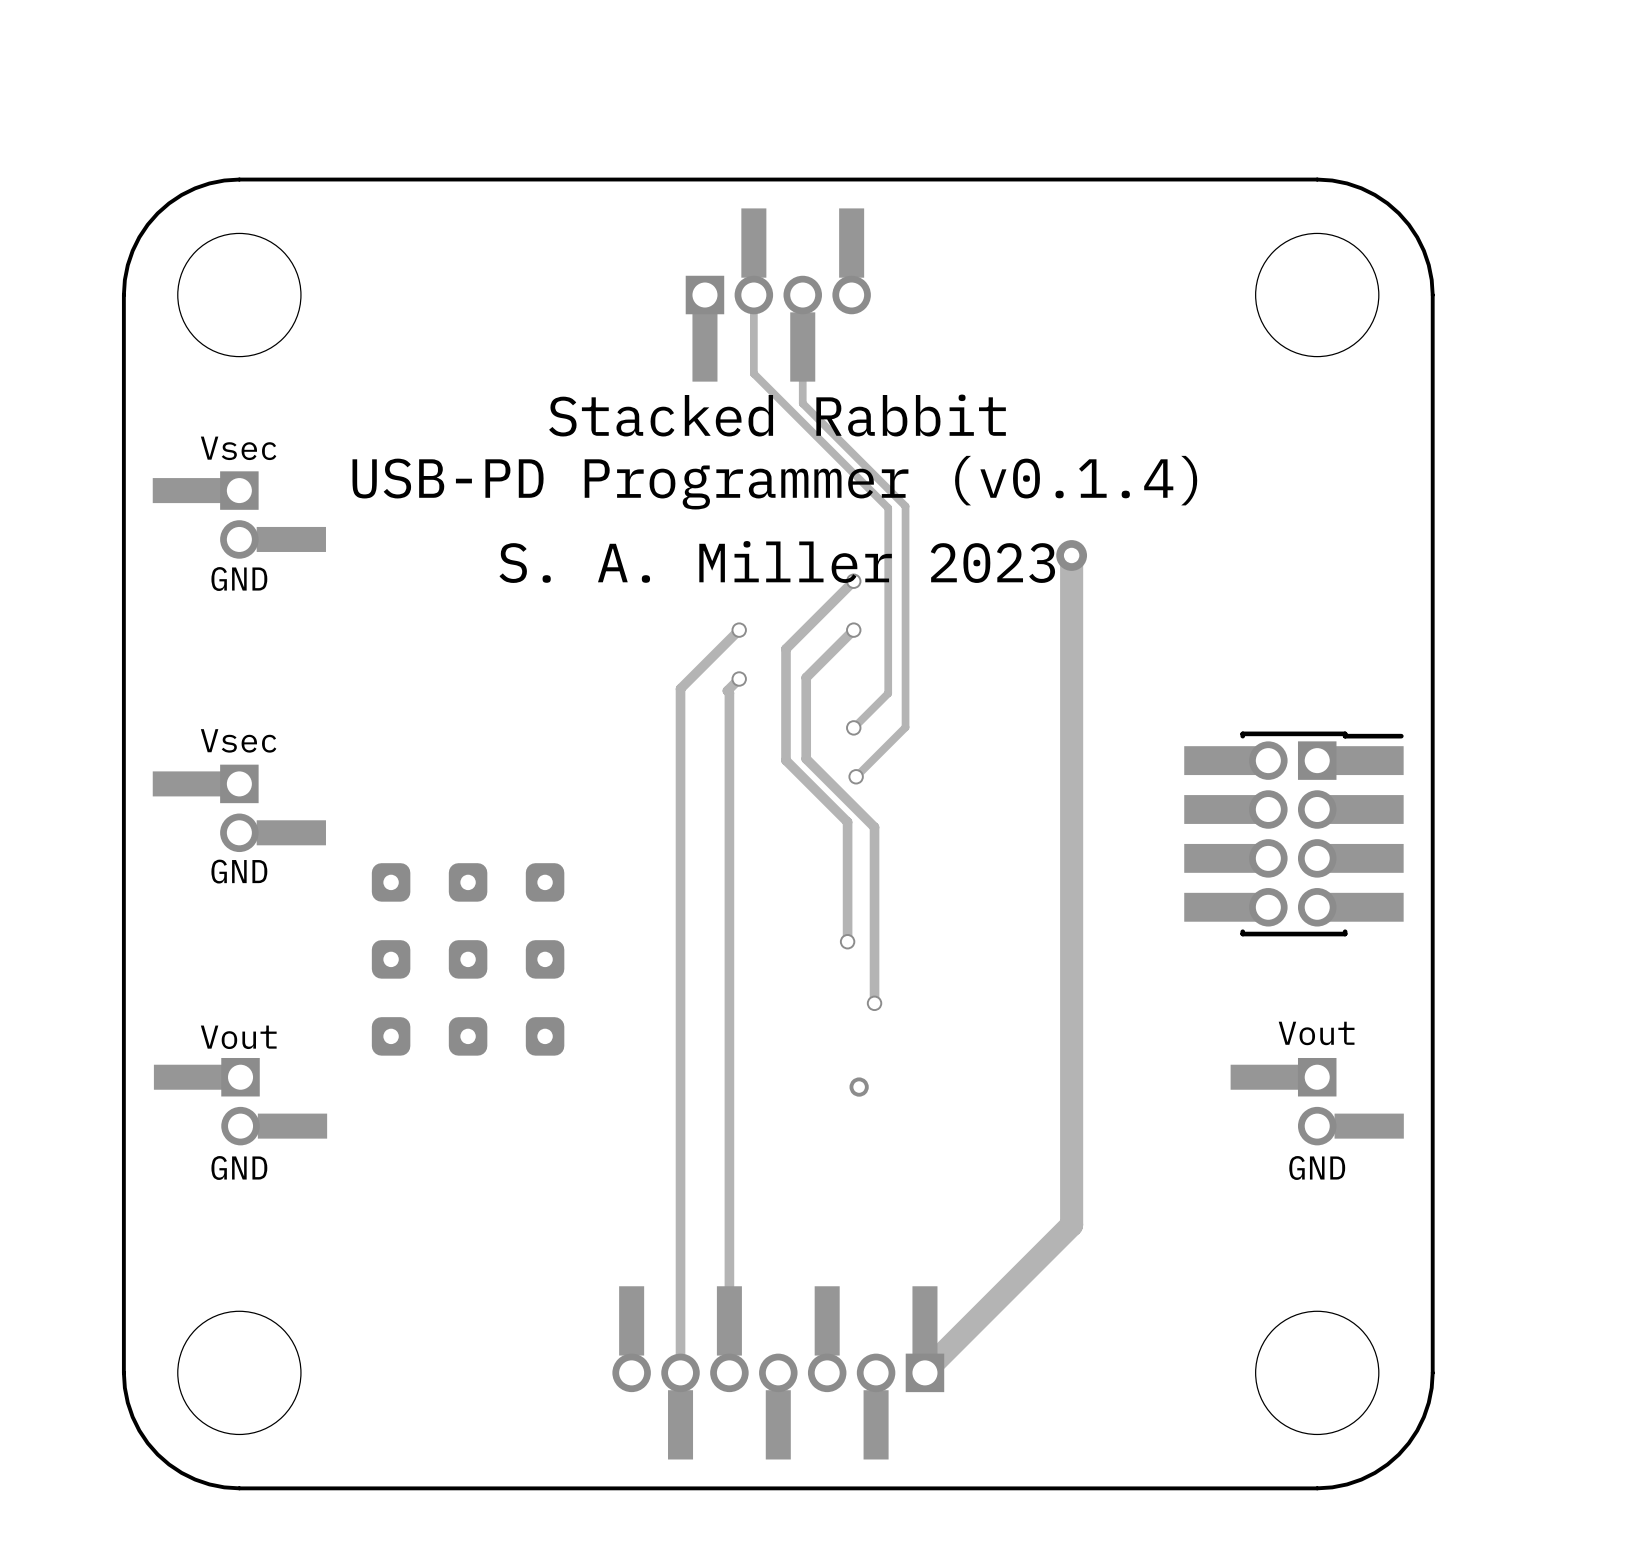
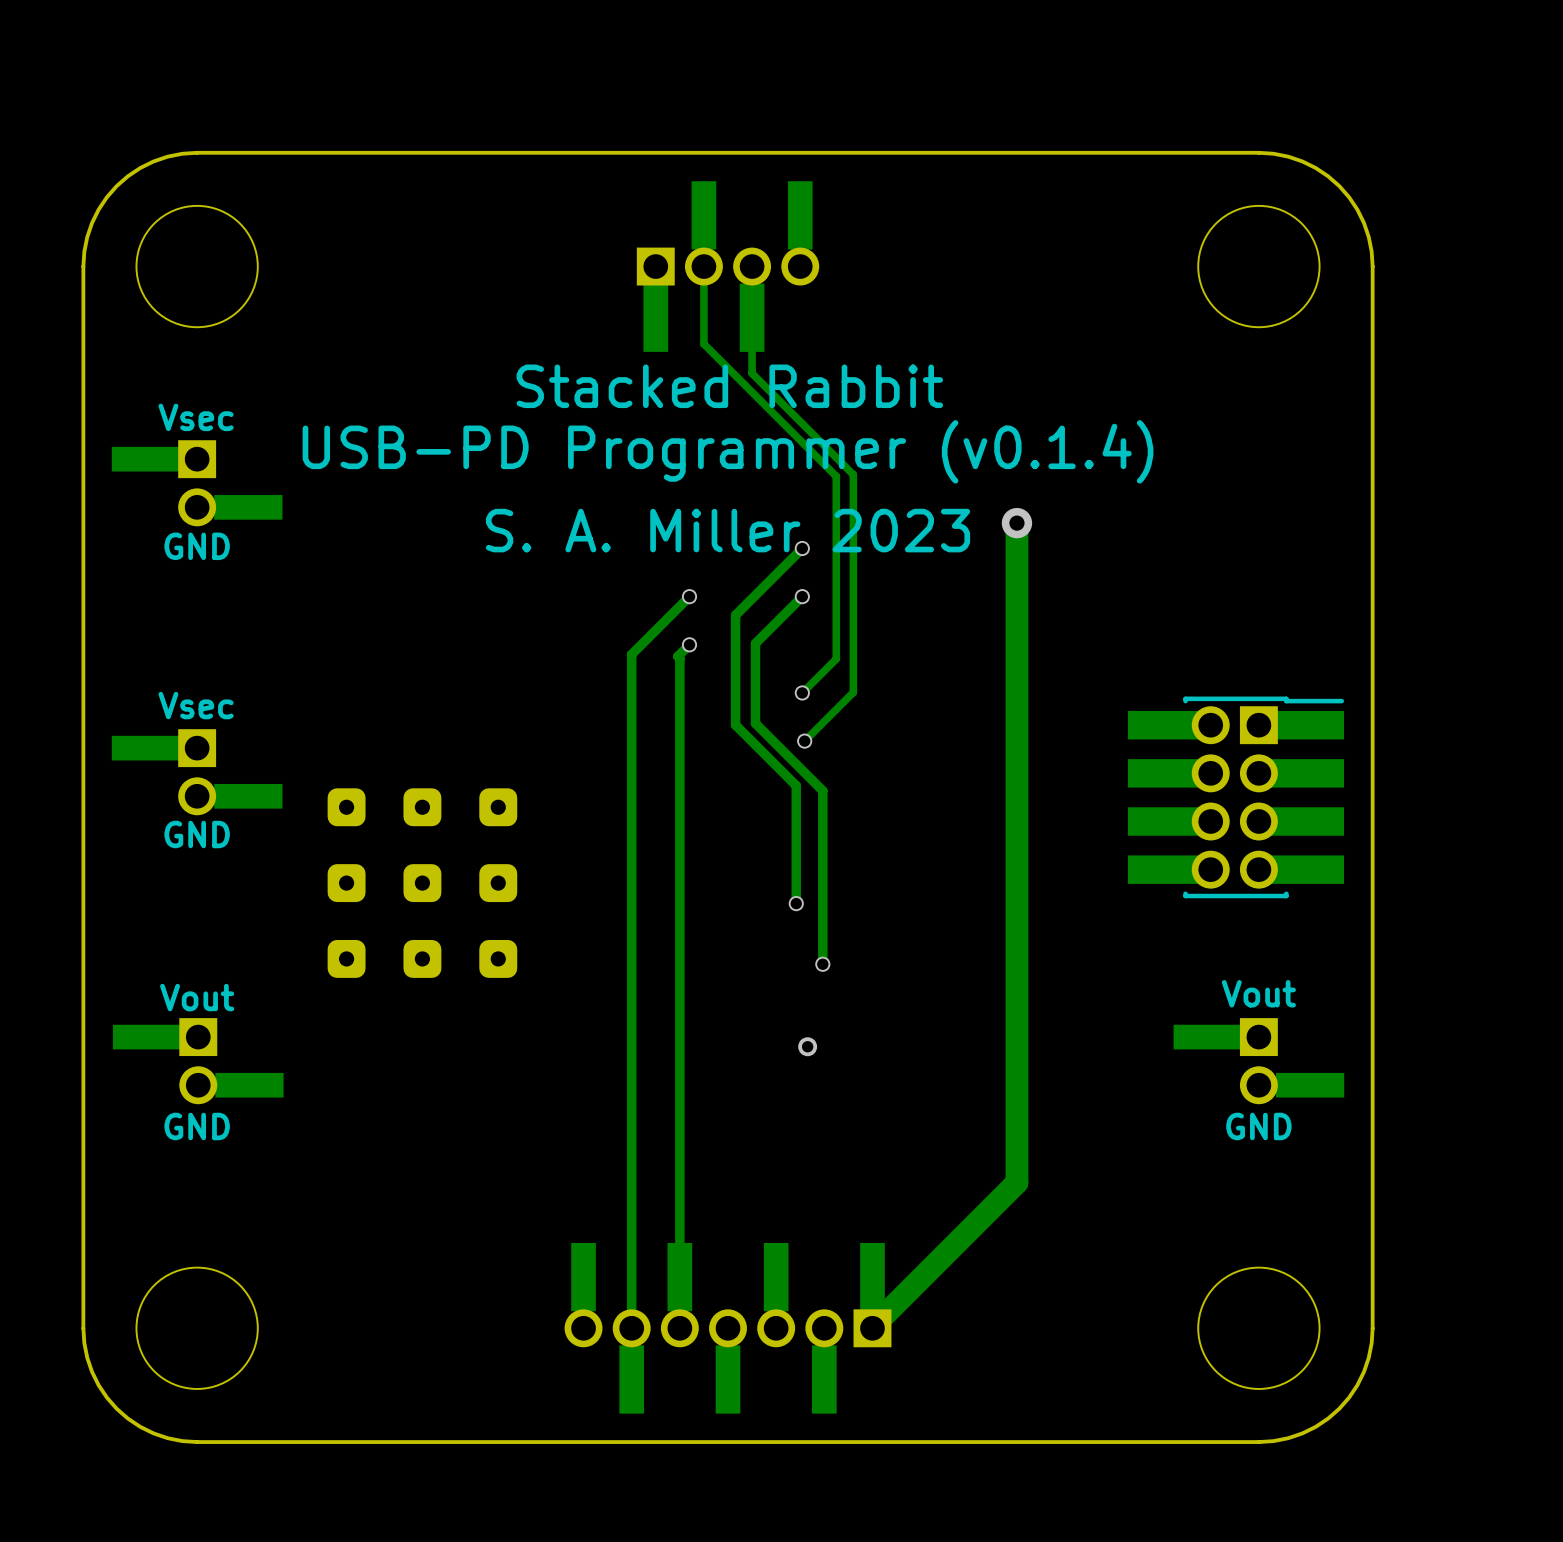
part position: (468, 959) -> (422, 883)

